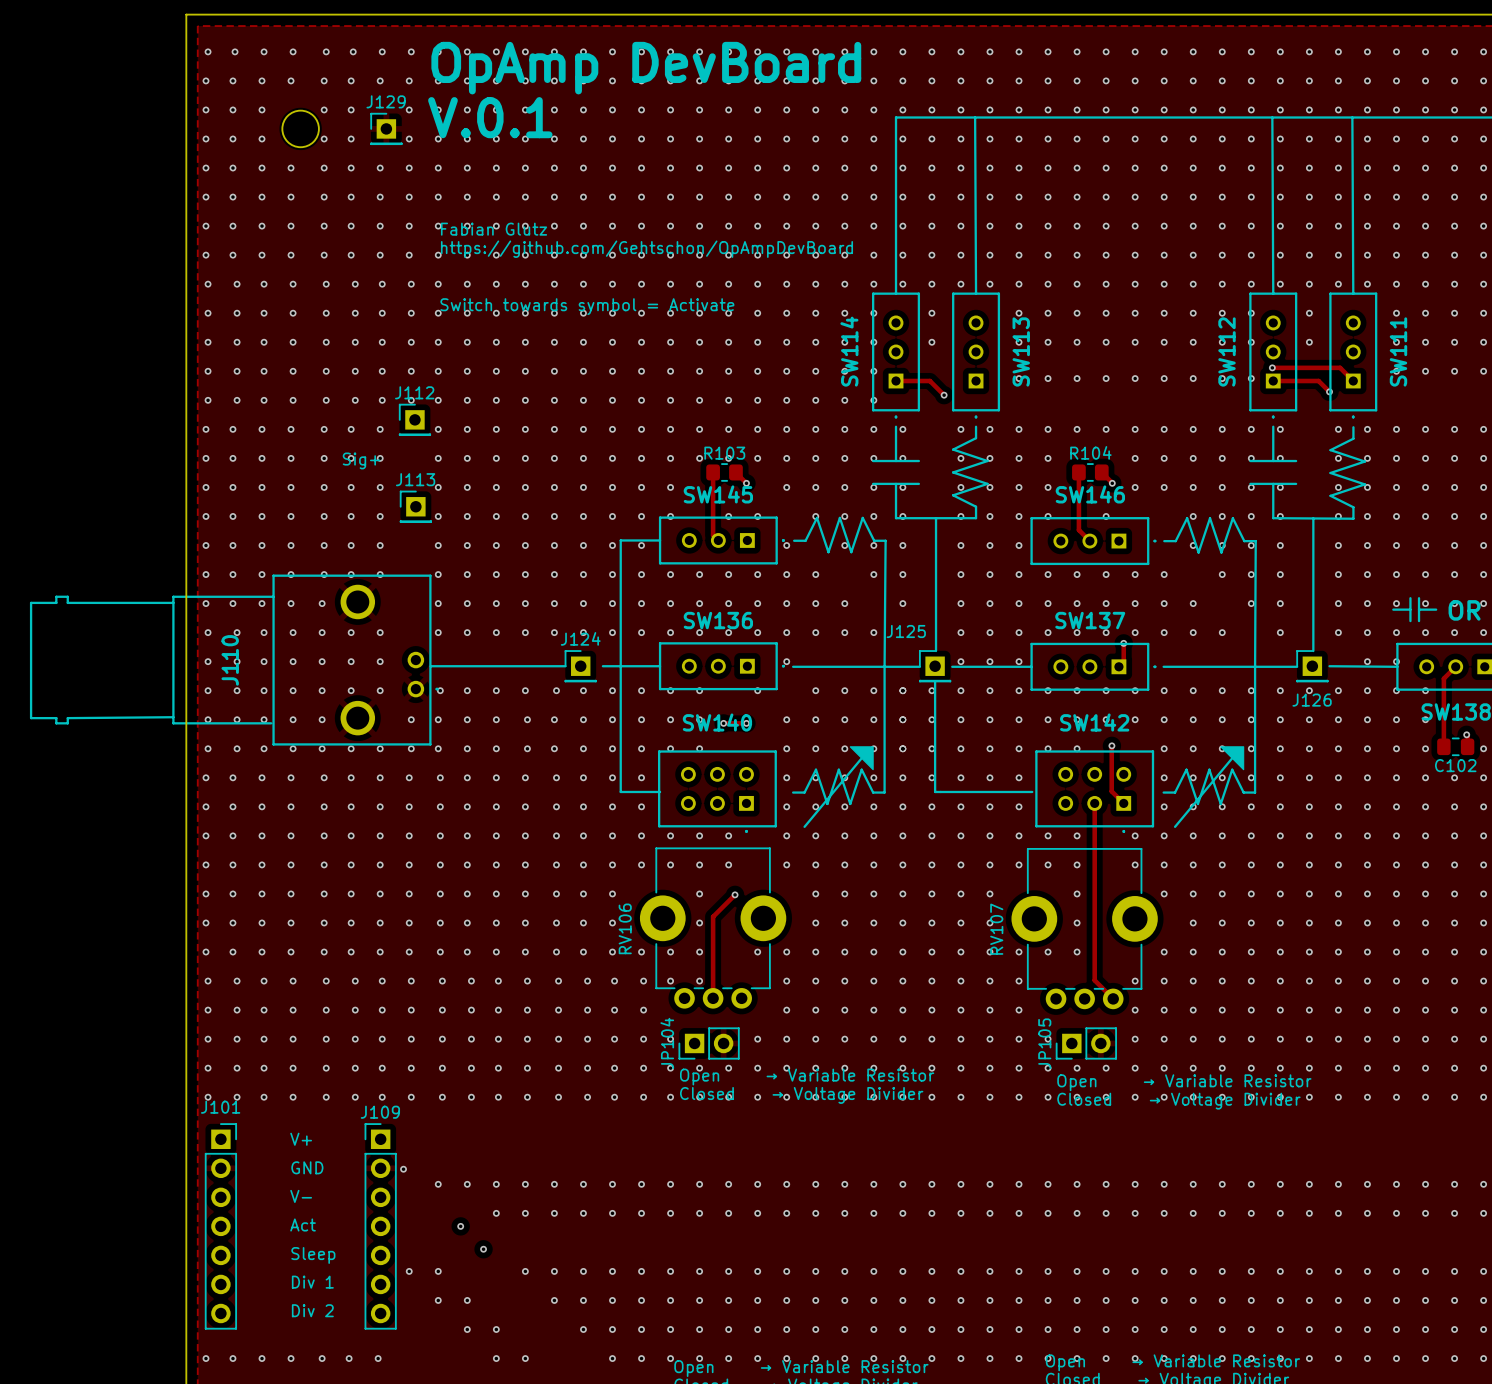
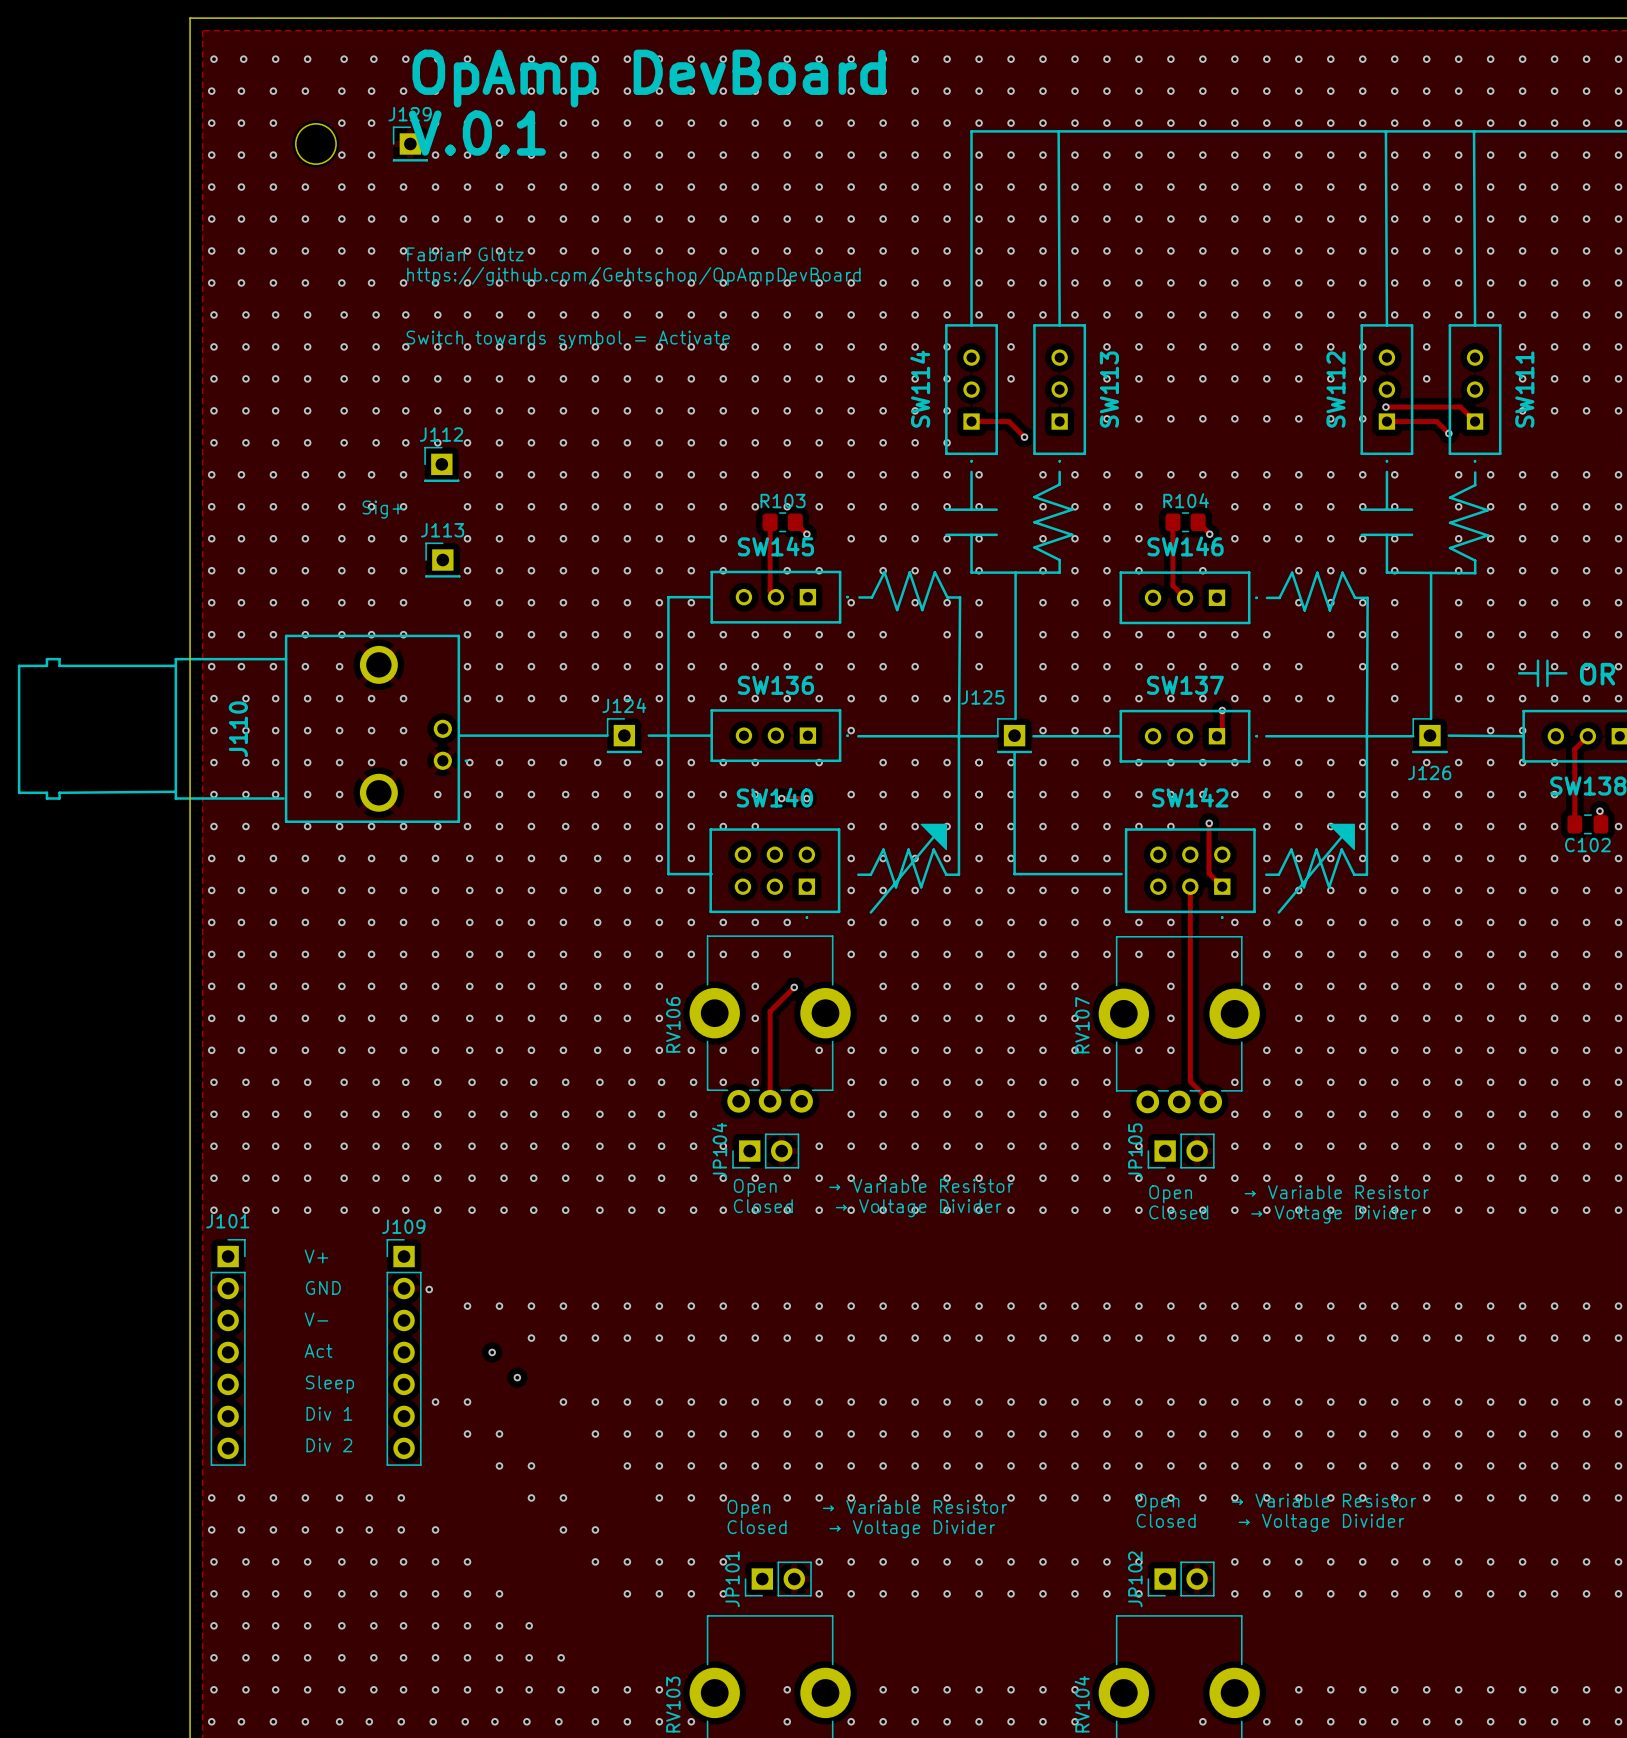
text position: OpAmp DevBoard (646, 68) -> OpAmp DevBoard (649, 78)
text position: V.0.1 (490, 117) -> V.0.1 (477, 133)
text position: Fabian Glutz (494, 229) -> Fabian Glutz (465, 254)
text position: https://github.com/Gehtschon/OpAmpDevBoard (646, 249) -> https://github.com/Gehtschon/OpAmpDevBoard (633, 276)
text position: Switch towards symbol = Activate (587, 306) -> Switch towards symbol = Activate (568, 339)

